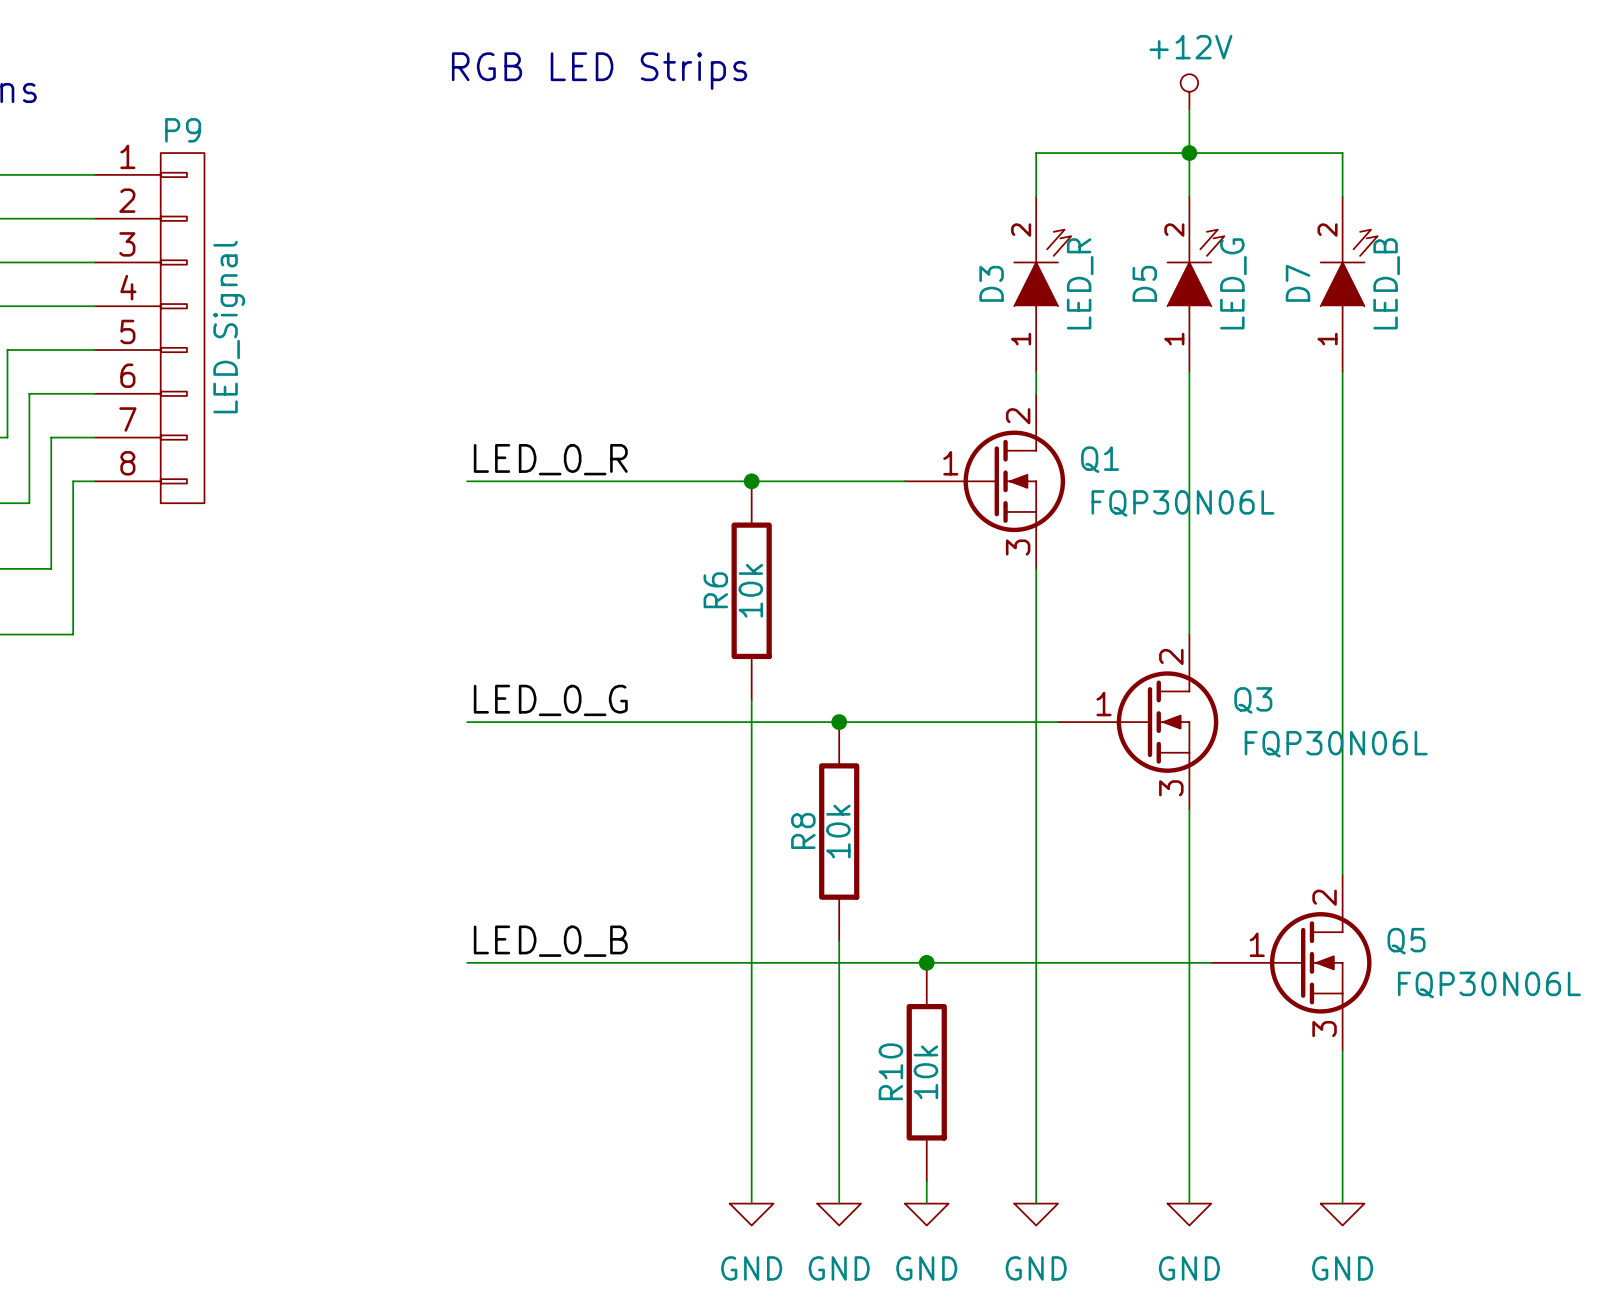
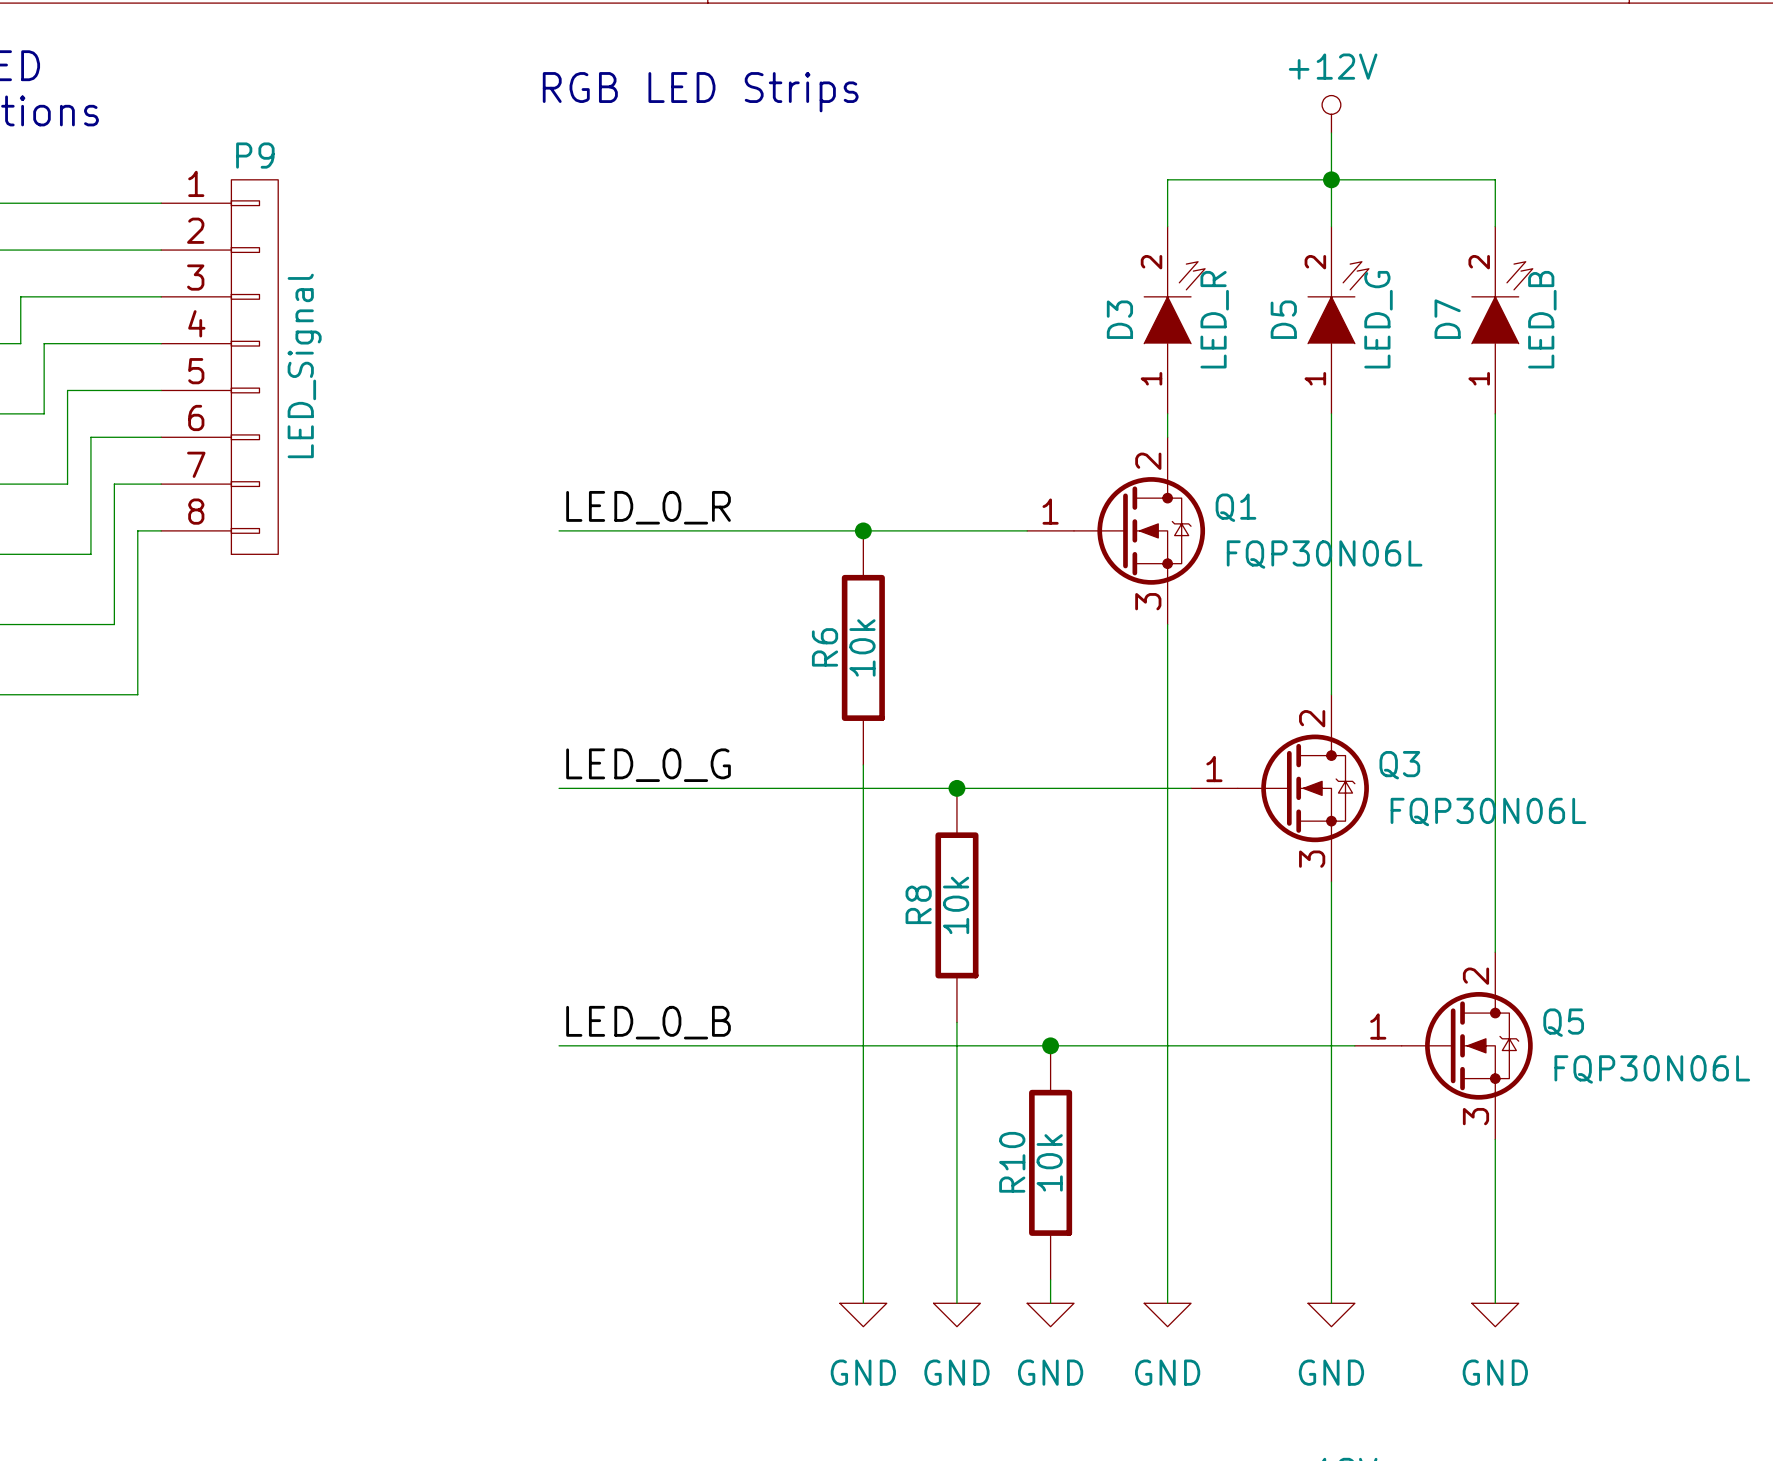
Q1 symbol: [904, 393, 1066, 569] -> [1027, 437, 1206, 625]
Q3 symbol: [1058, 634, 1219, 810] -> [1191, 694, 1369, 882]
Q5 symbol: [1211, 875, 1372, 1051] -> [1354, 952, 1533, 1140]

